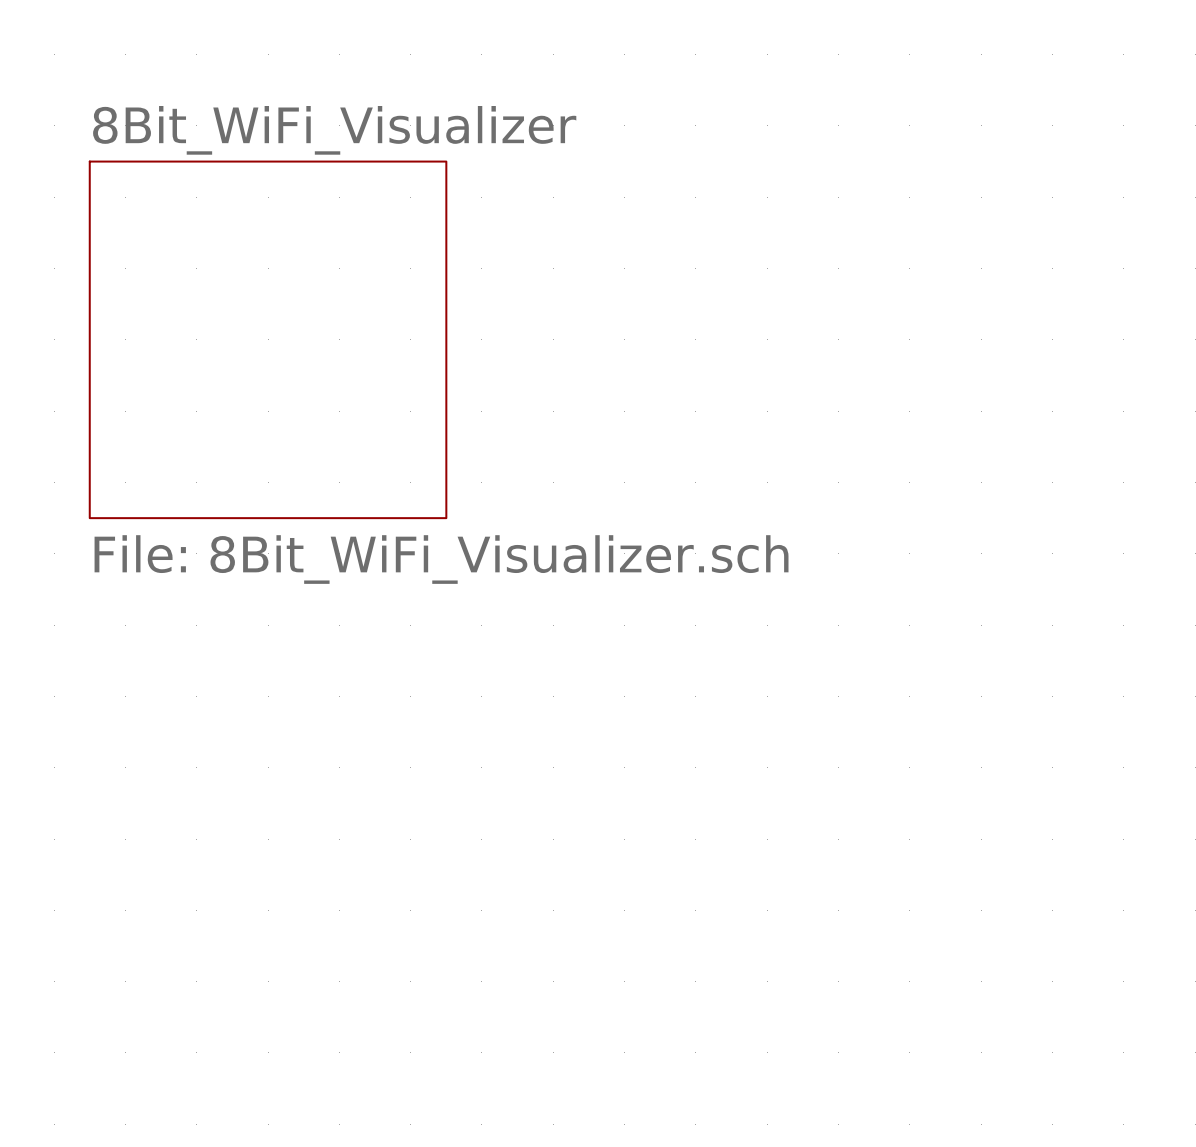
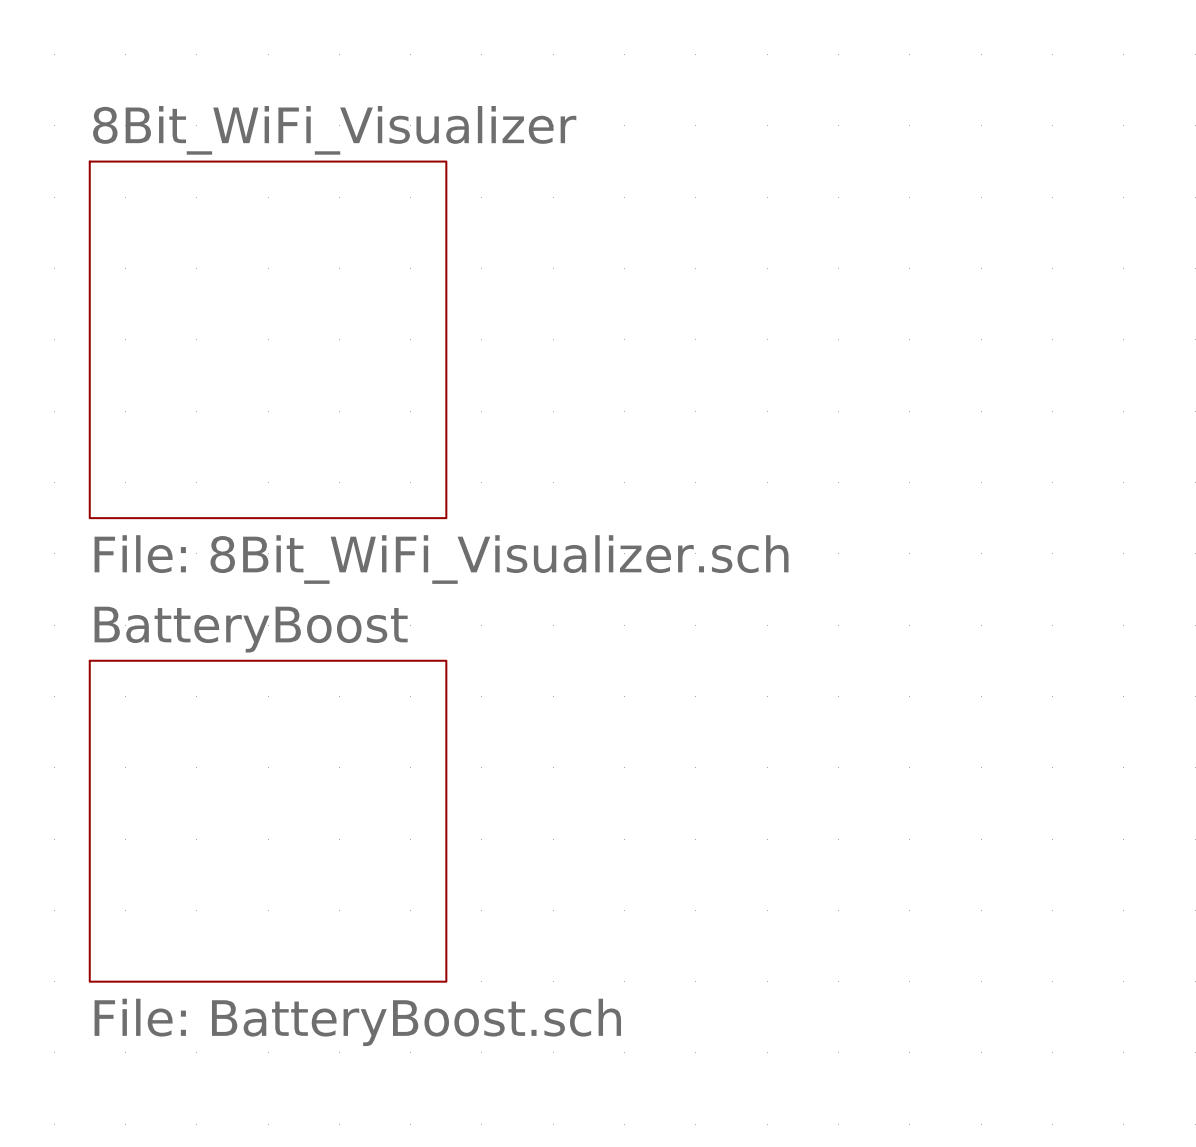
sheet BatteryBoost: none -> File: BatteryBoost.sch (268, 821)

